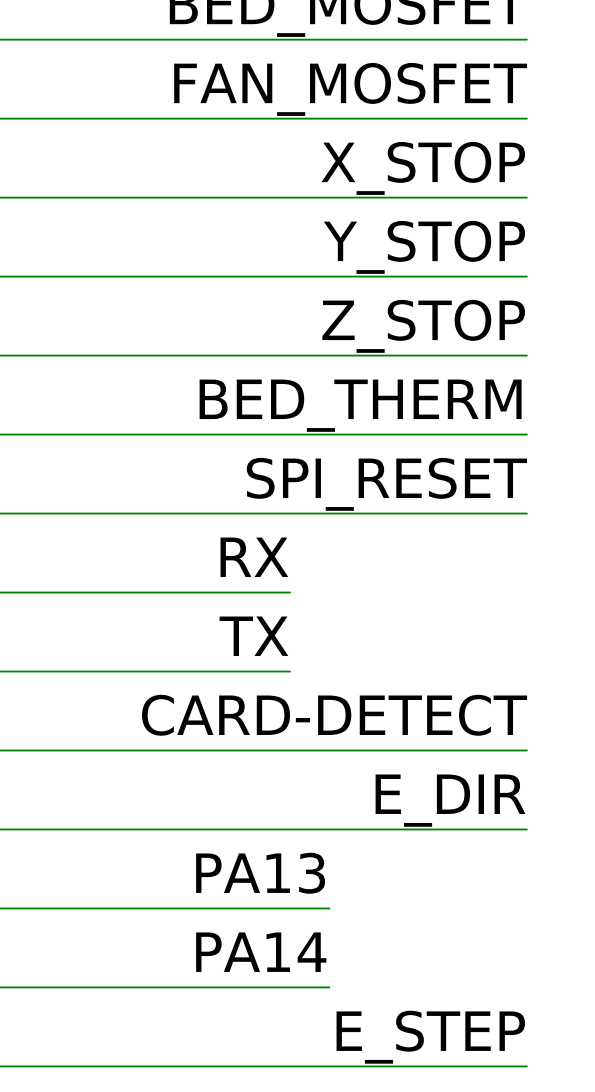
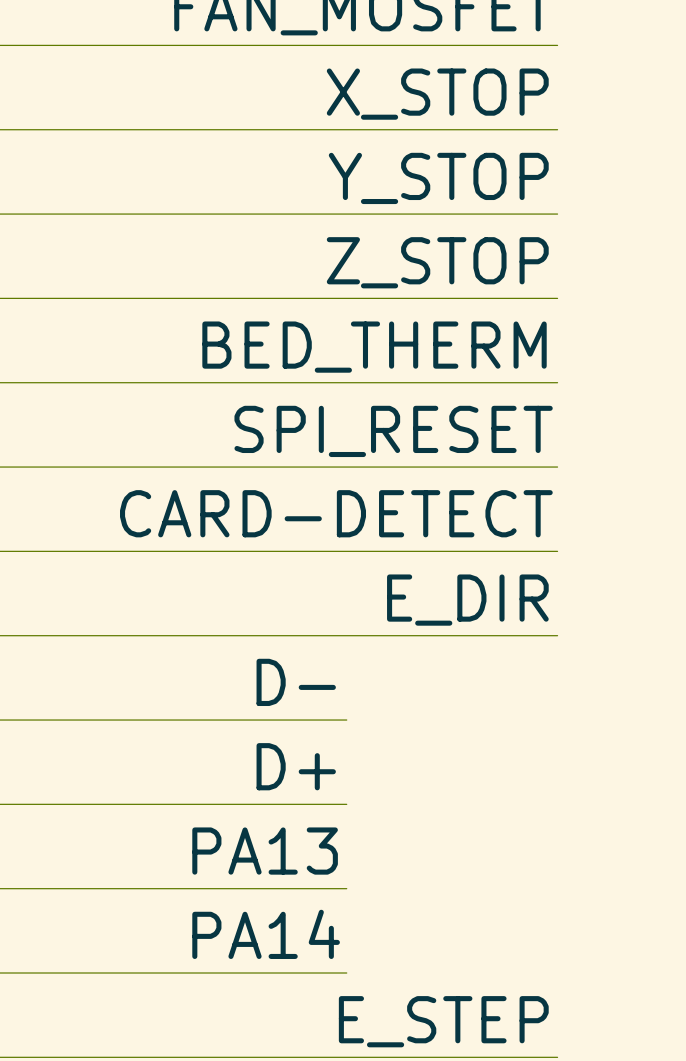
label: RX (254, 557) -> none
wire: none -> (304, 551) (557, 551)
label: TX (253, 636) -> none
wire: none -> (304, 635) (557, 635)
label: none -> D- (296, 682)
label position: CARD-DETECT (334, 715) -> CARD-DETECT (336, 513)
wire: (329, 750) (526, 750) -> none
label: none -> D+ (296, 766)
label position: E_DIR (450, 800) -> E_DIR (467, 600)
wire: (329, 829) (526, 829) -> none

